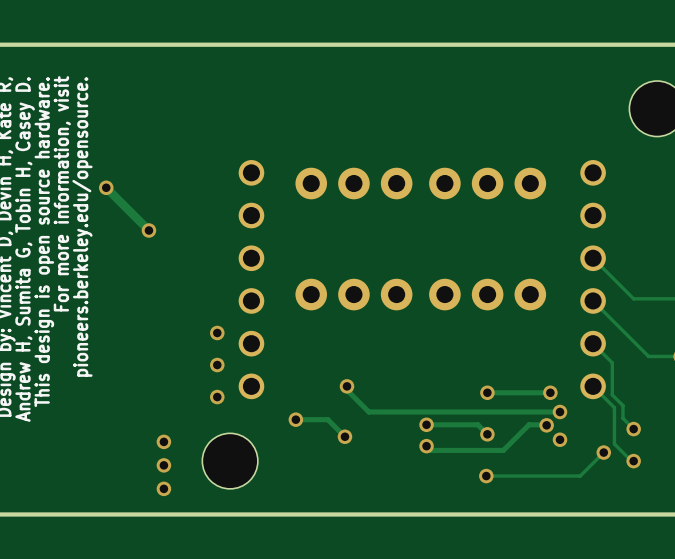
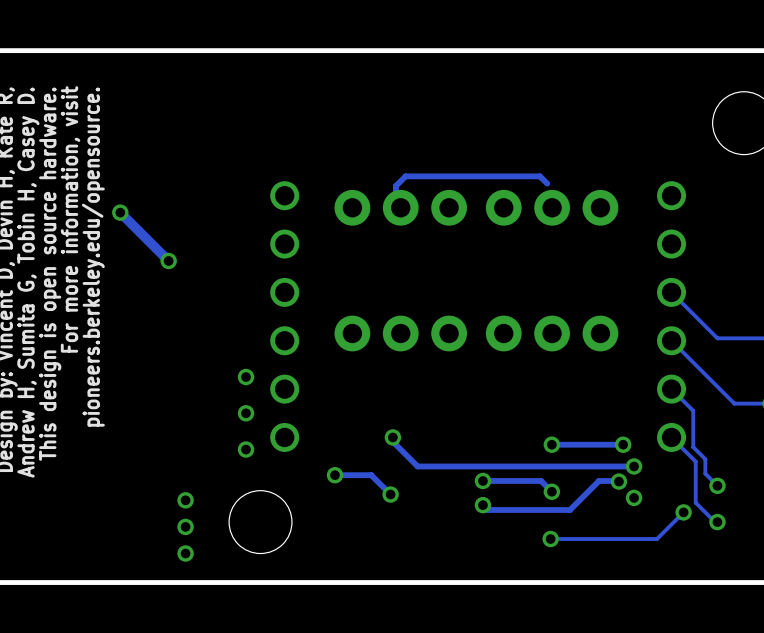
track: none -> (547, 183) (540, 176) (405, 176) (395, 186) (395, 207)

